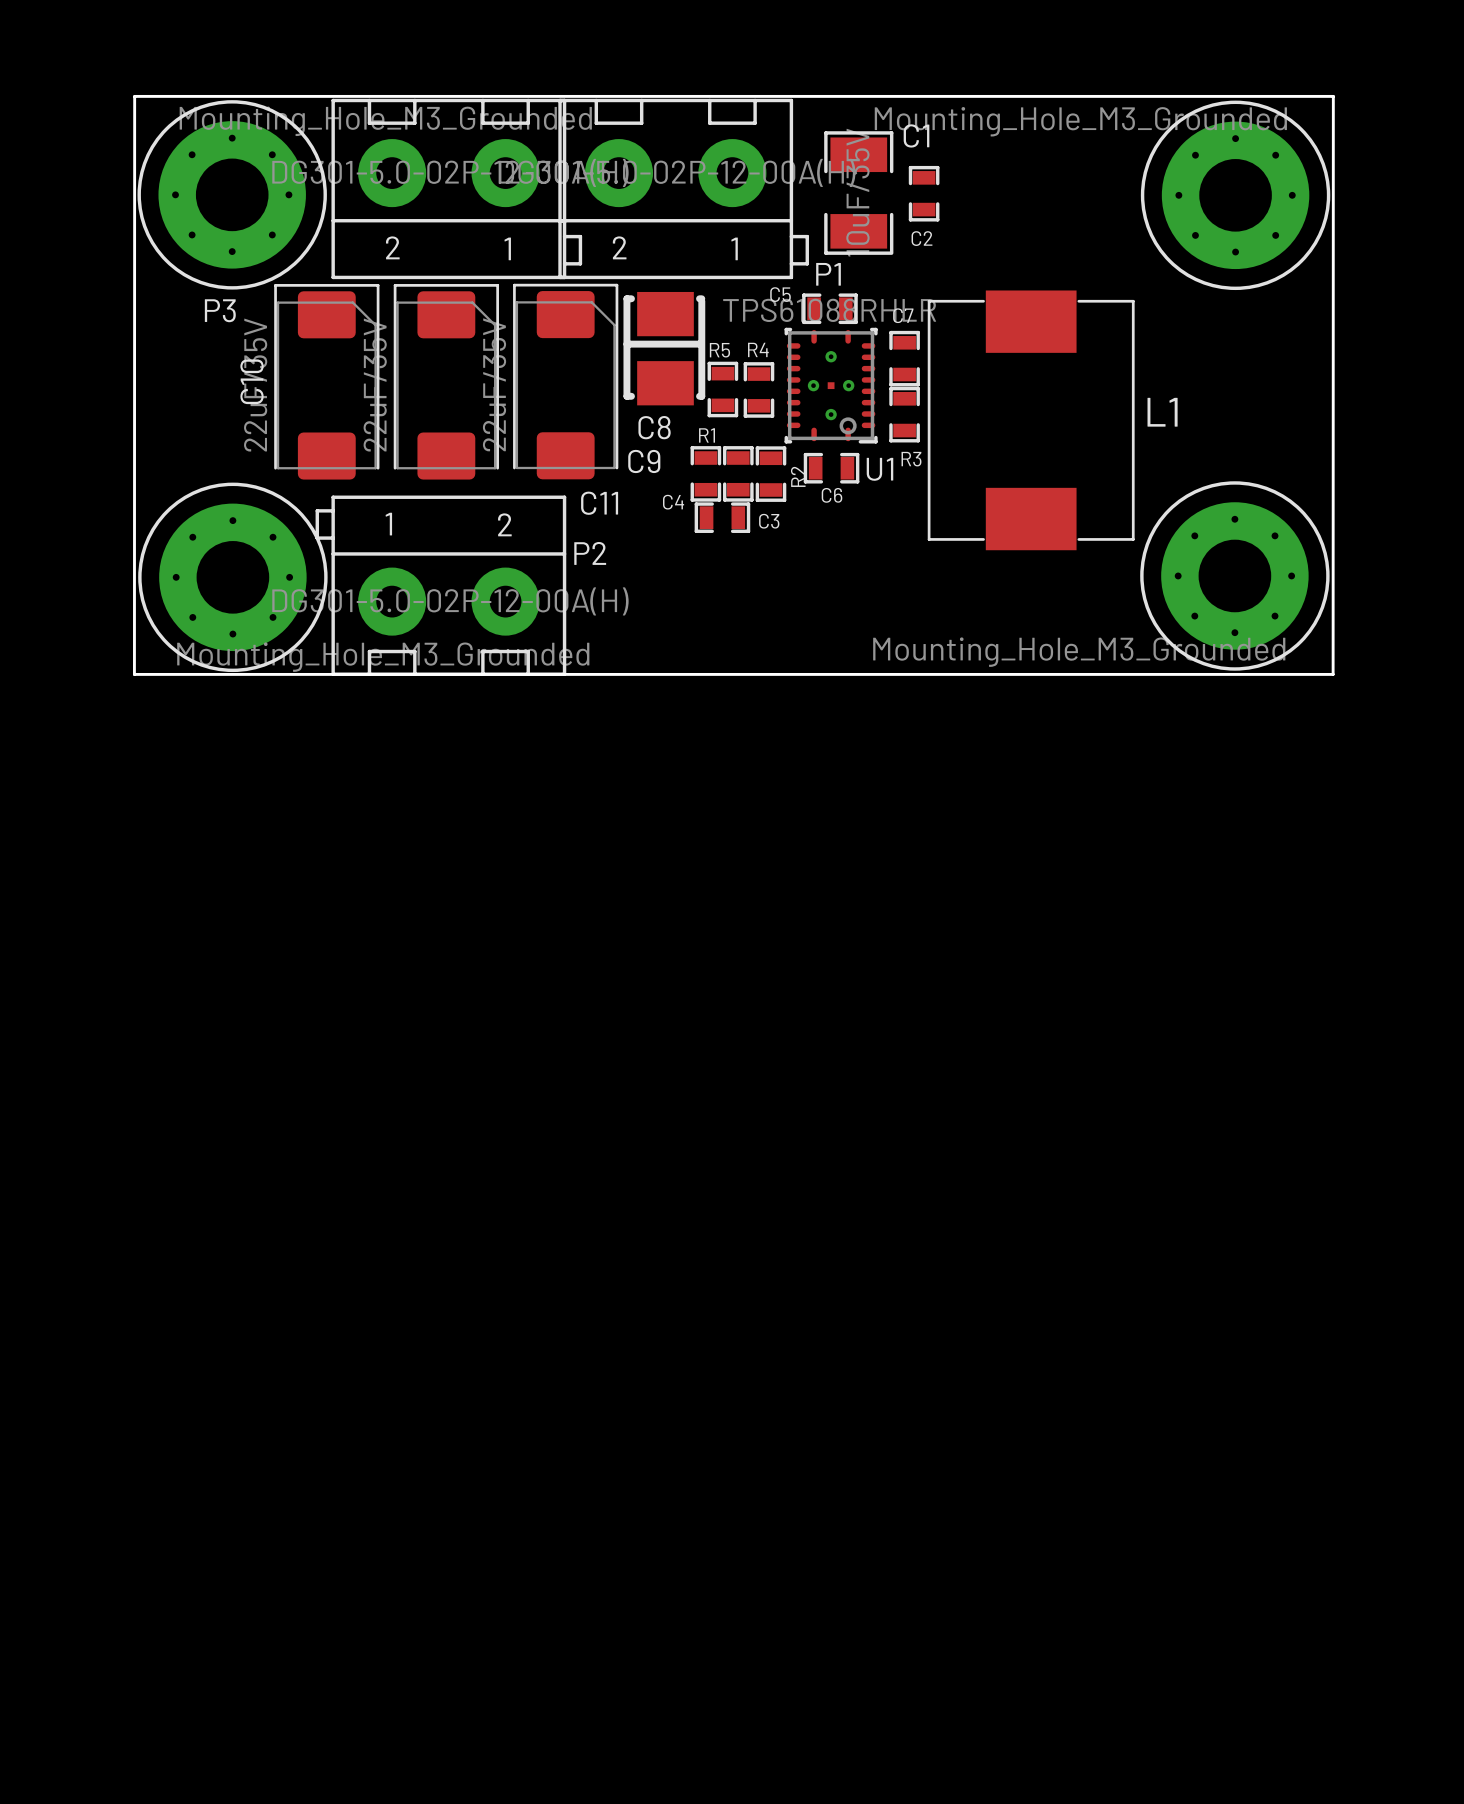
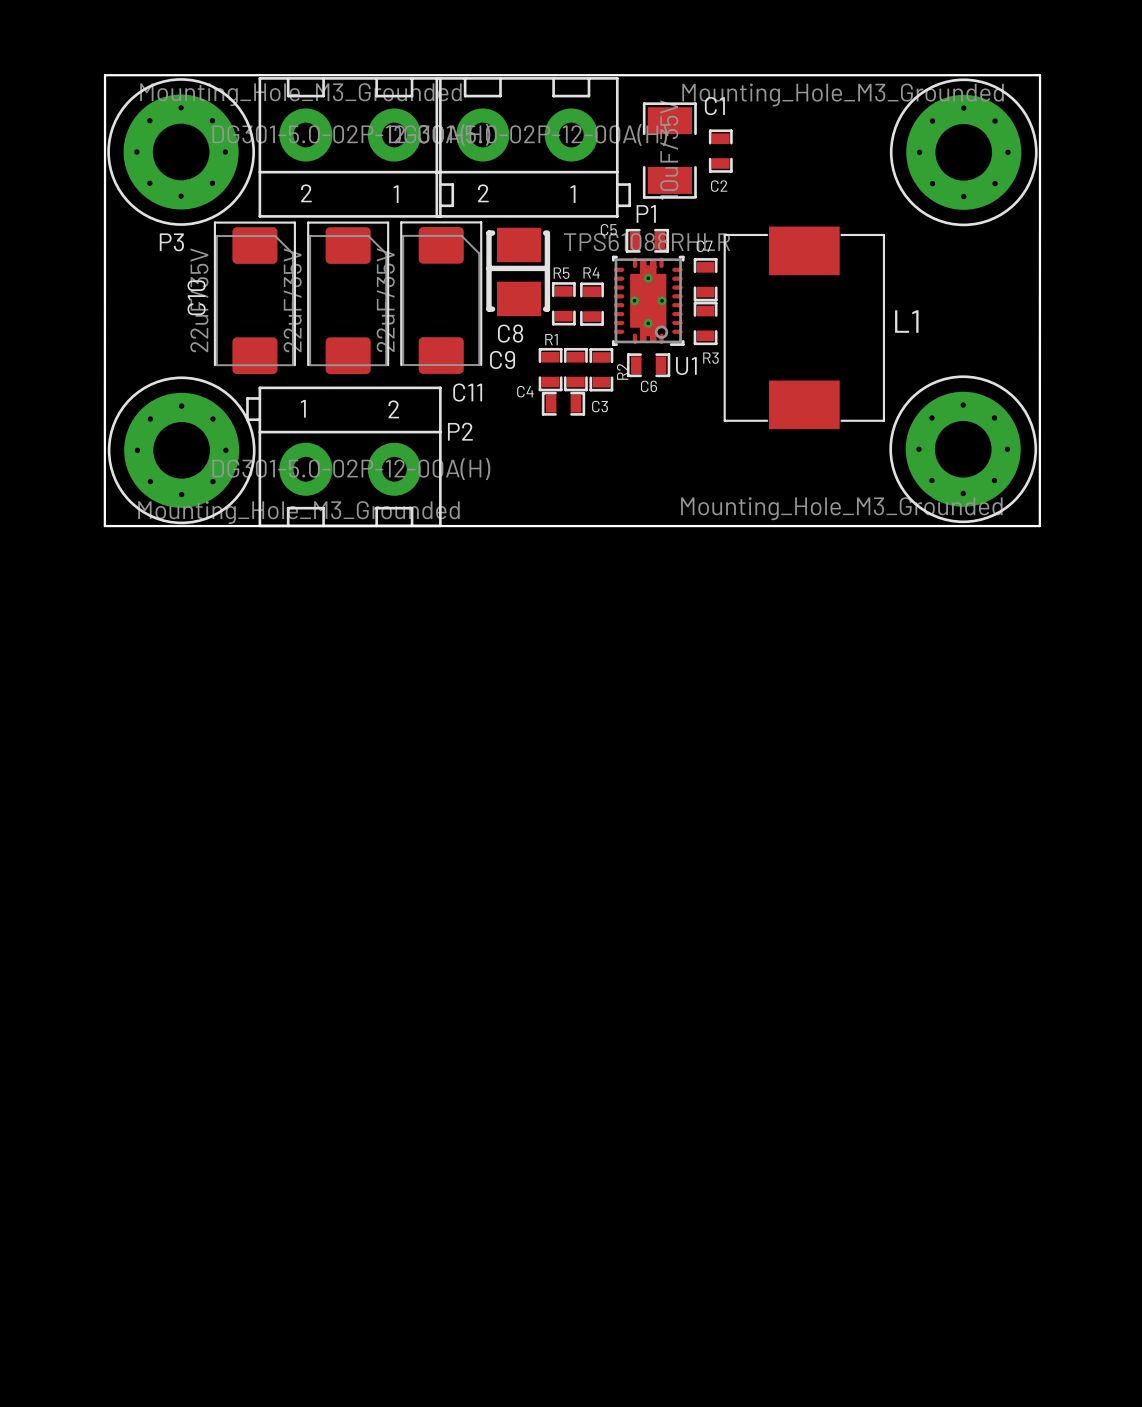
U1 footprint: [784, 327, 878, 444] -> [611, 255, 685, 346]

